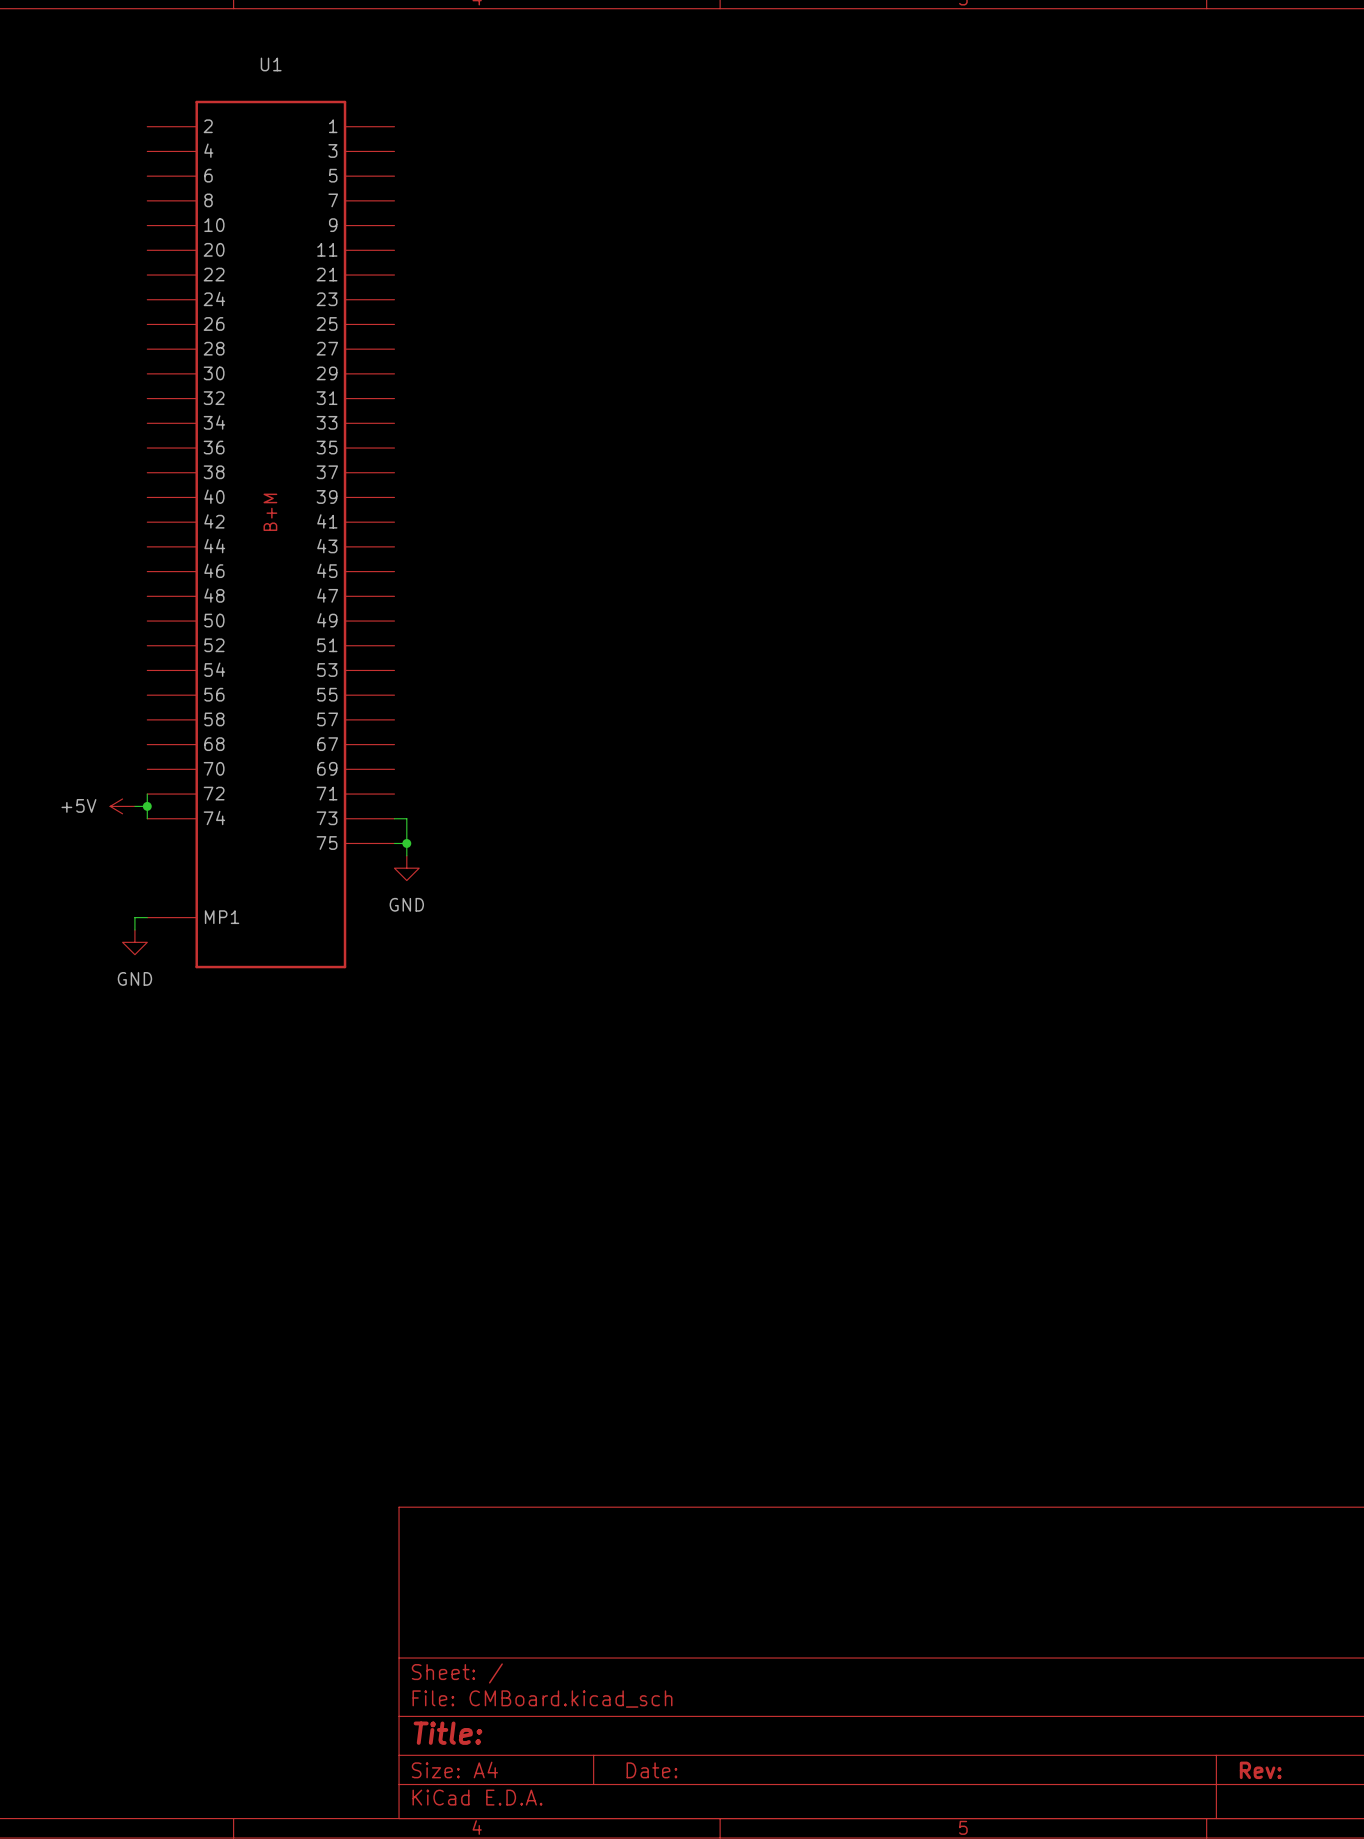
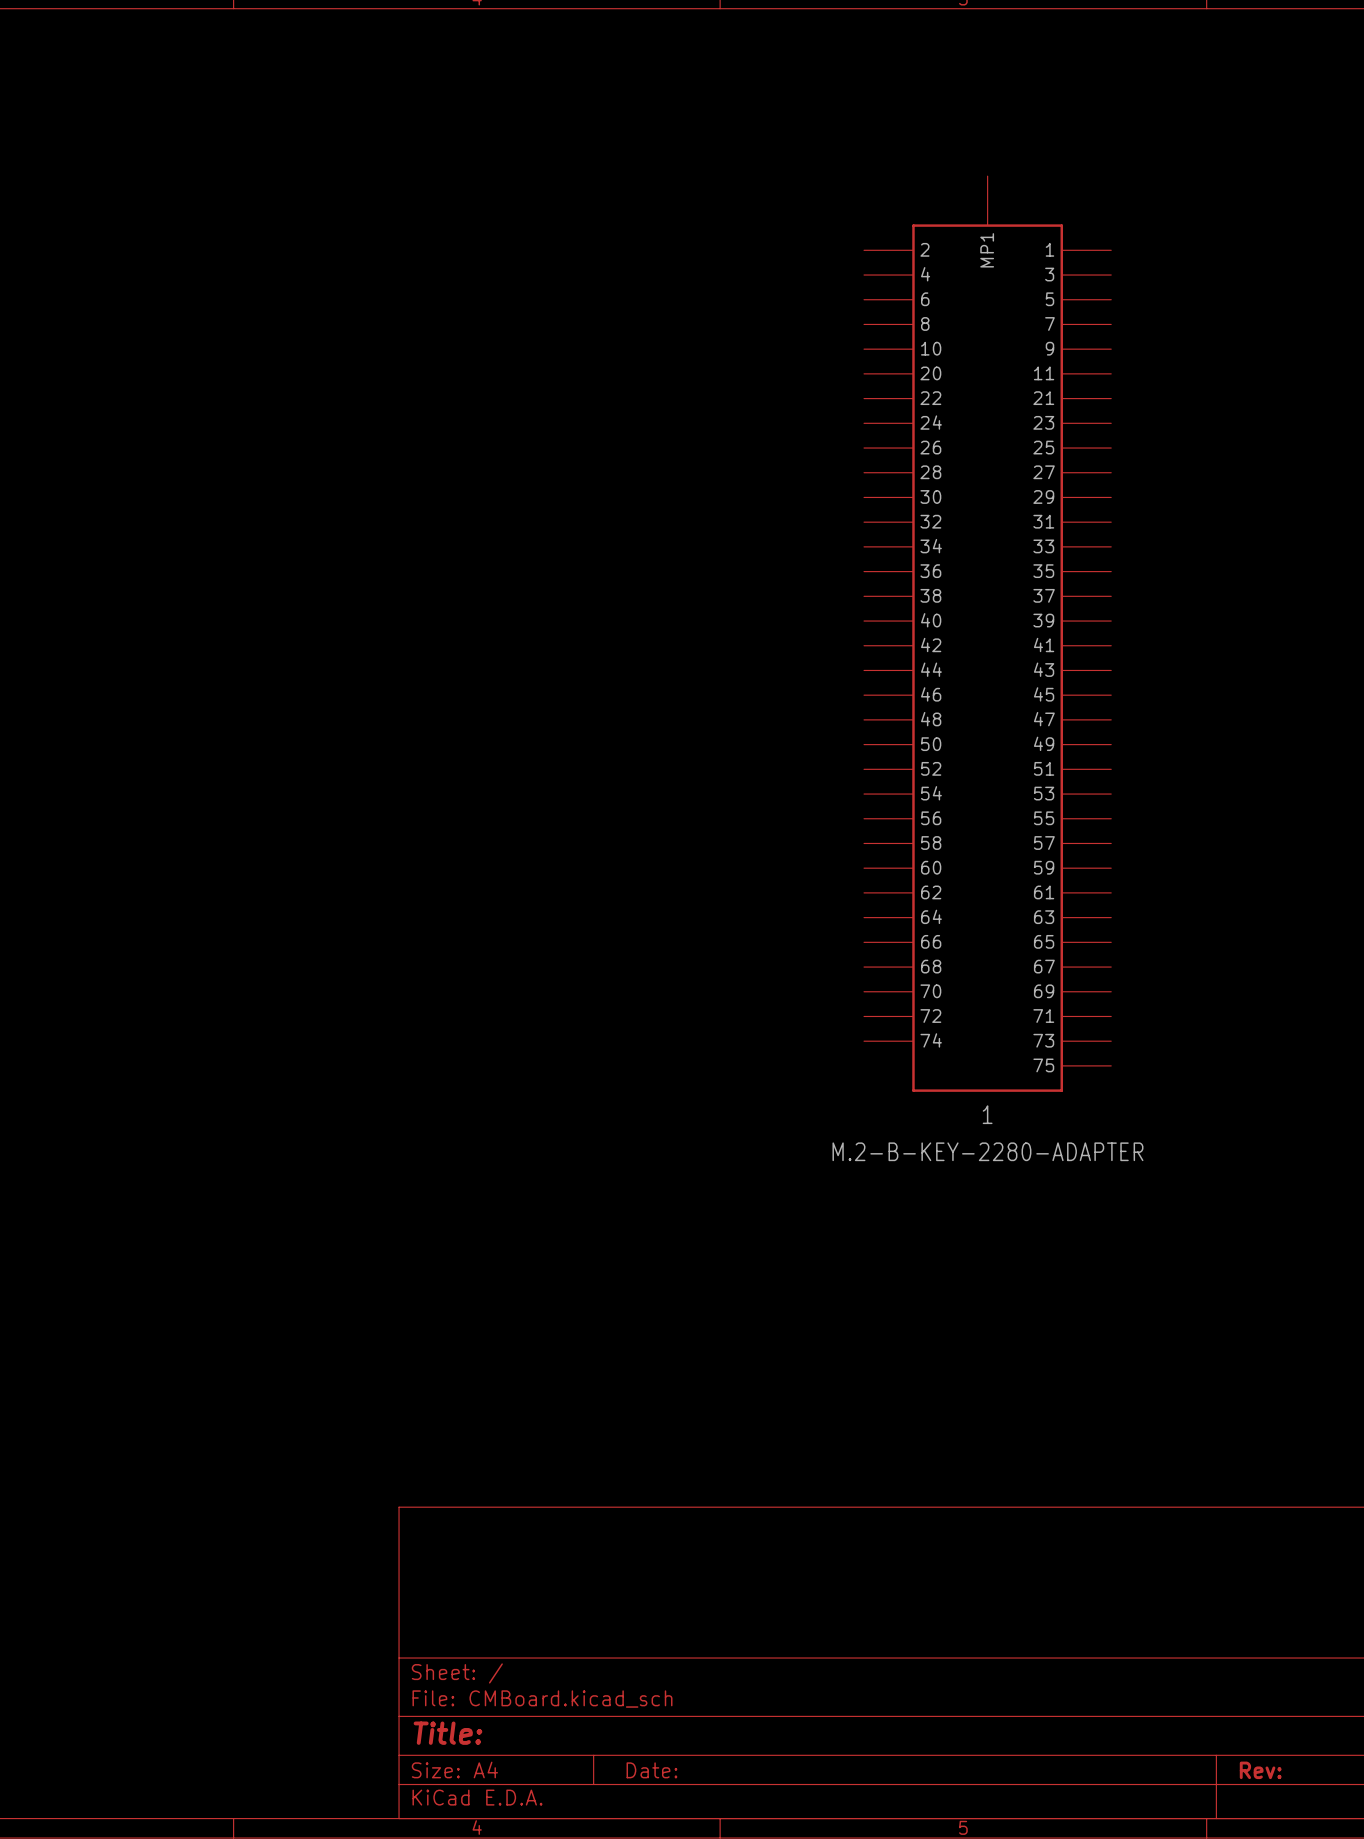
U1: (270, 534) -> none
1: none -> M.2-B-KEY-2280-ADAPTER (987, 634)
wire: (147, 794) (147, 818) -> none
power symbol: +5V (122, 806) -> none
wire: (134, 806) (147, 806) -> none
junction: (147, 806) -> none
wire: (394, 818) (406, 818) (406, 855) -> none
wire: (394, 843) (406, 843) -> none
junction: (406, 843) -> none
power symbol: GND (406, 868) -> none
wire: (147, 917) (134, 917) (134, 929) -> none
power symbol: GND (134, 942) -> none

